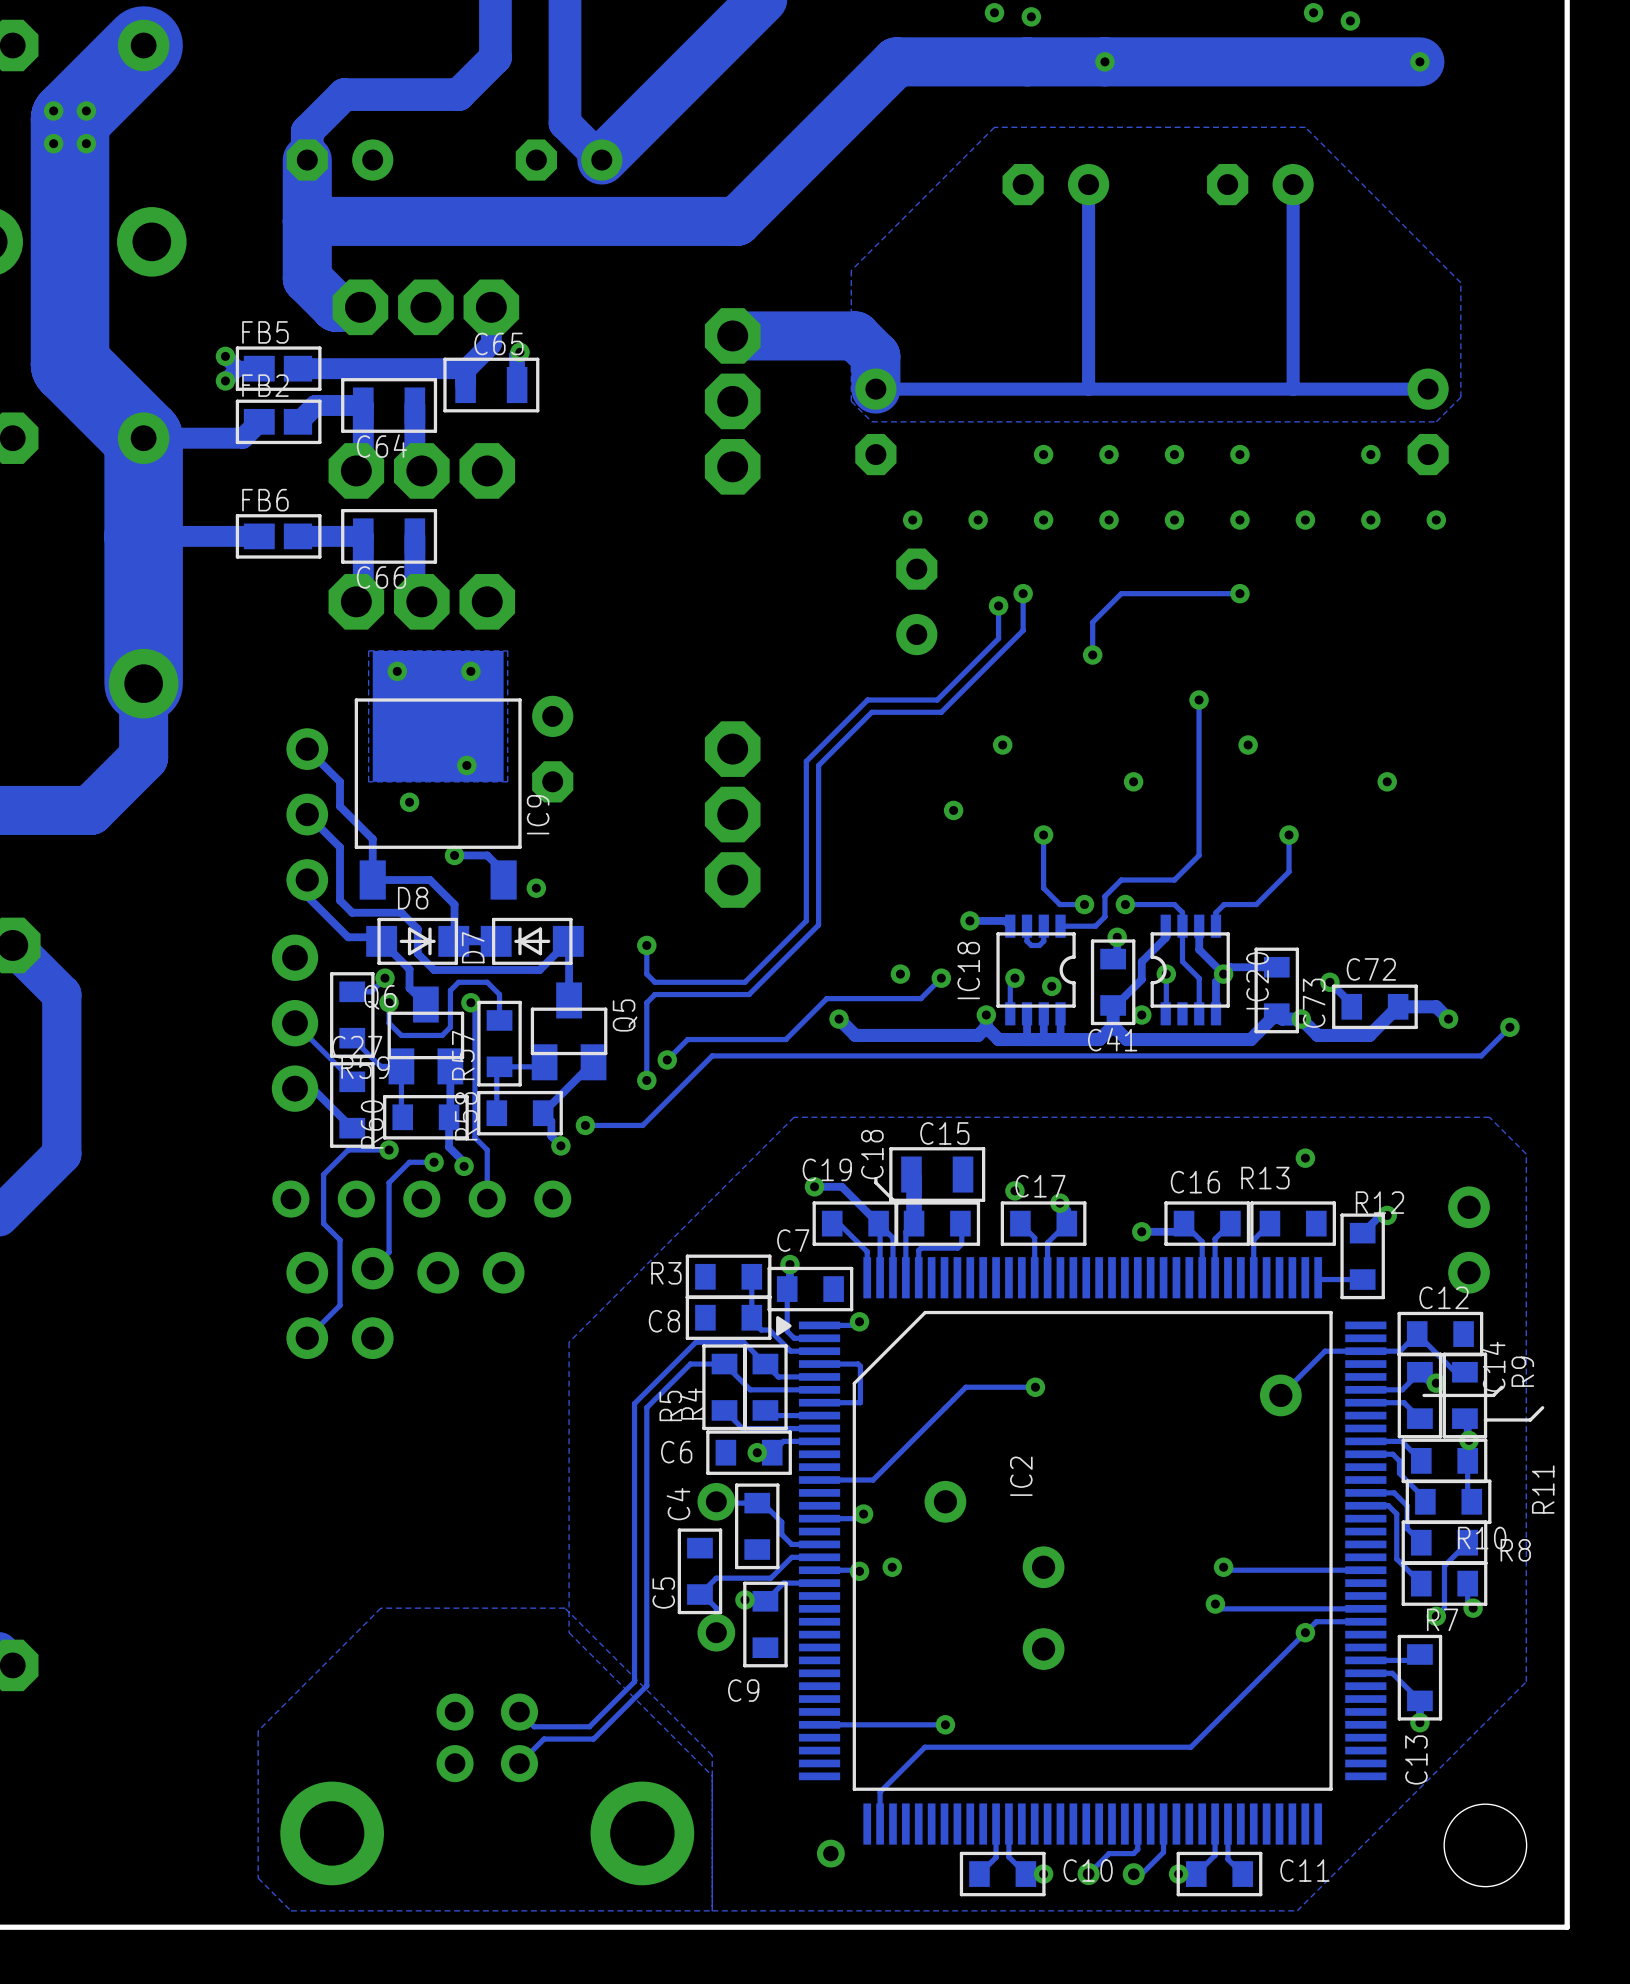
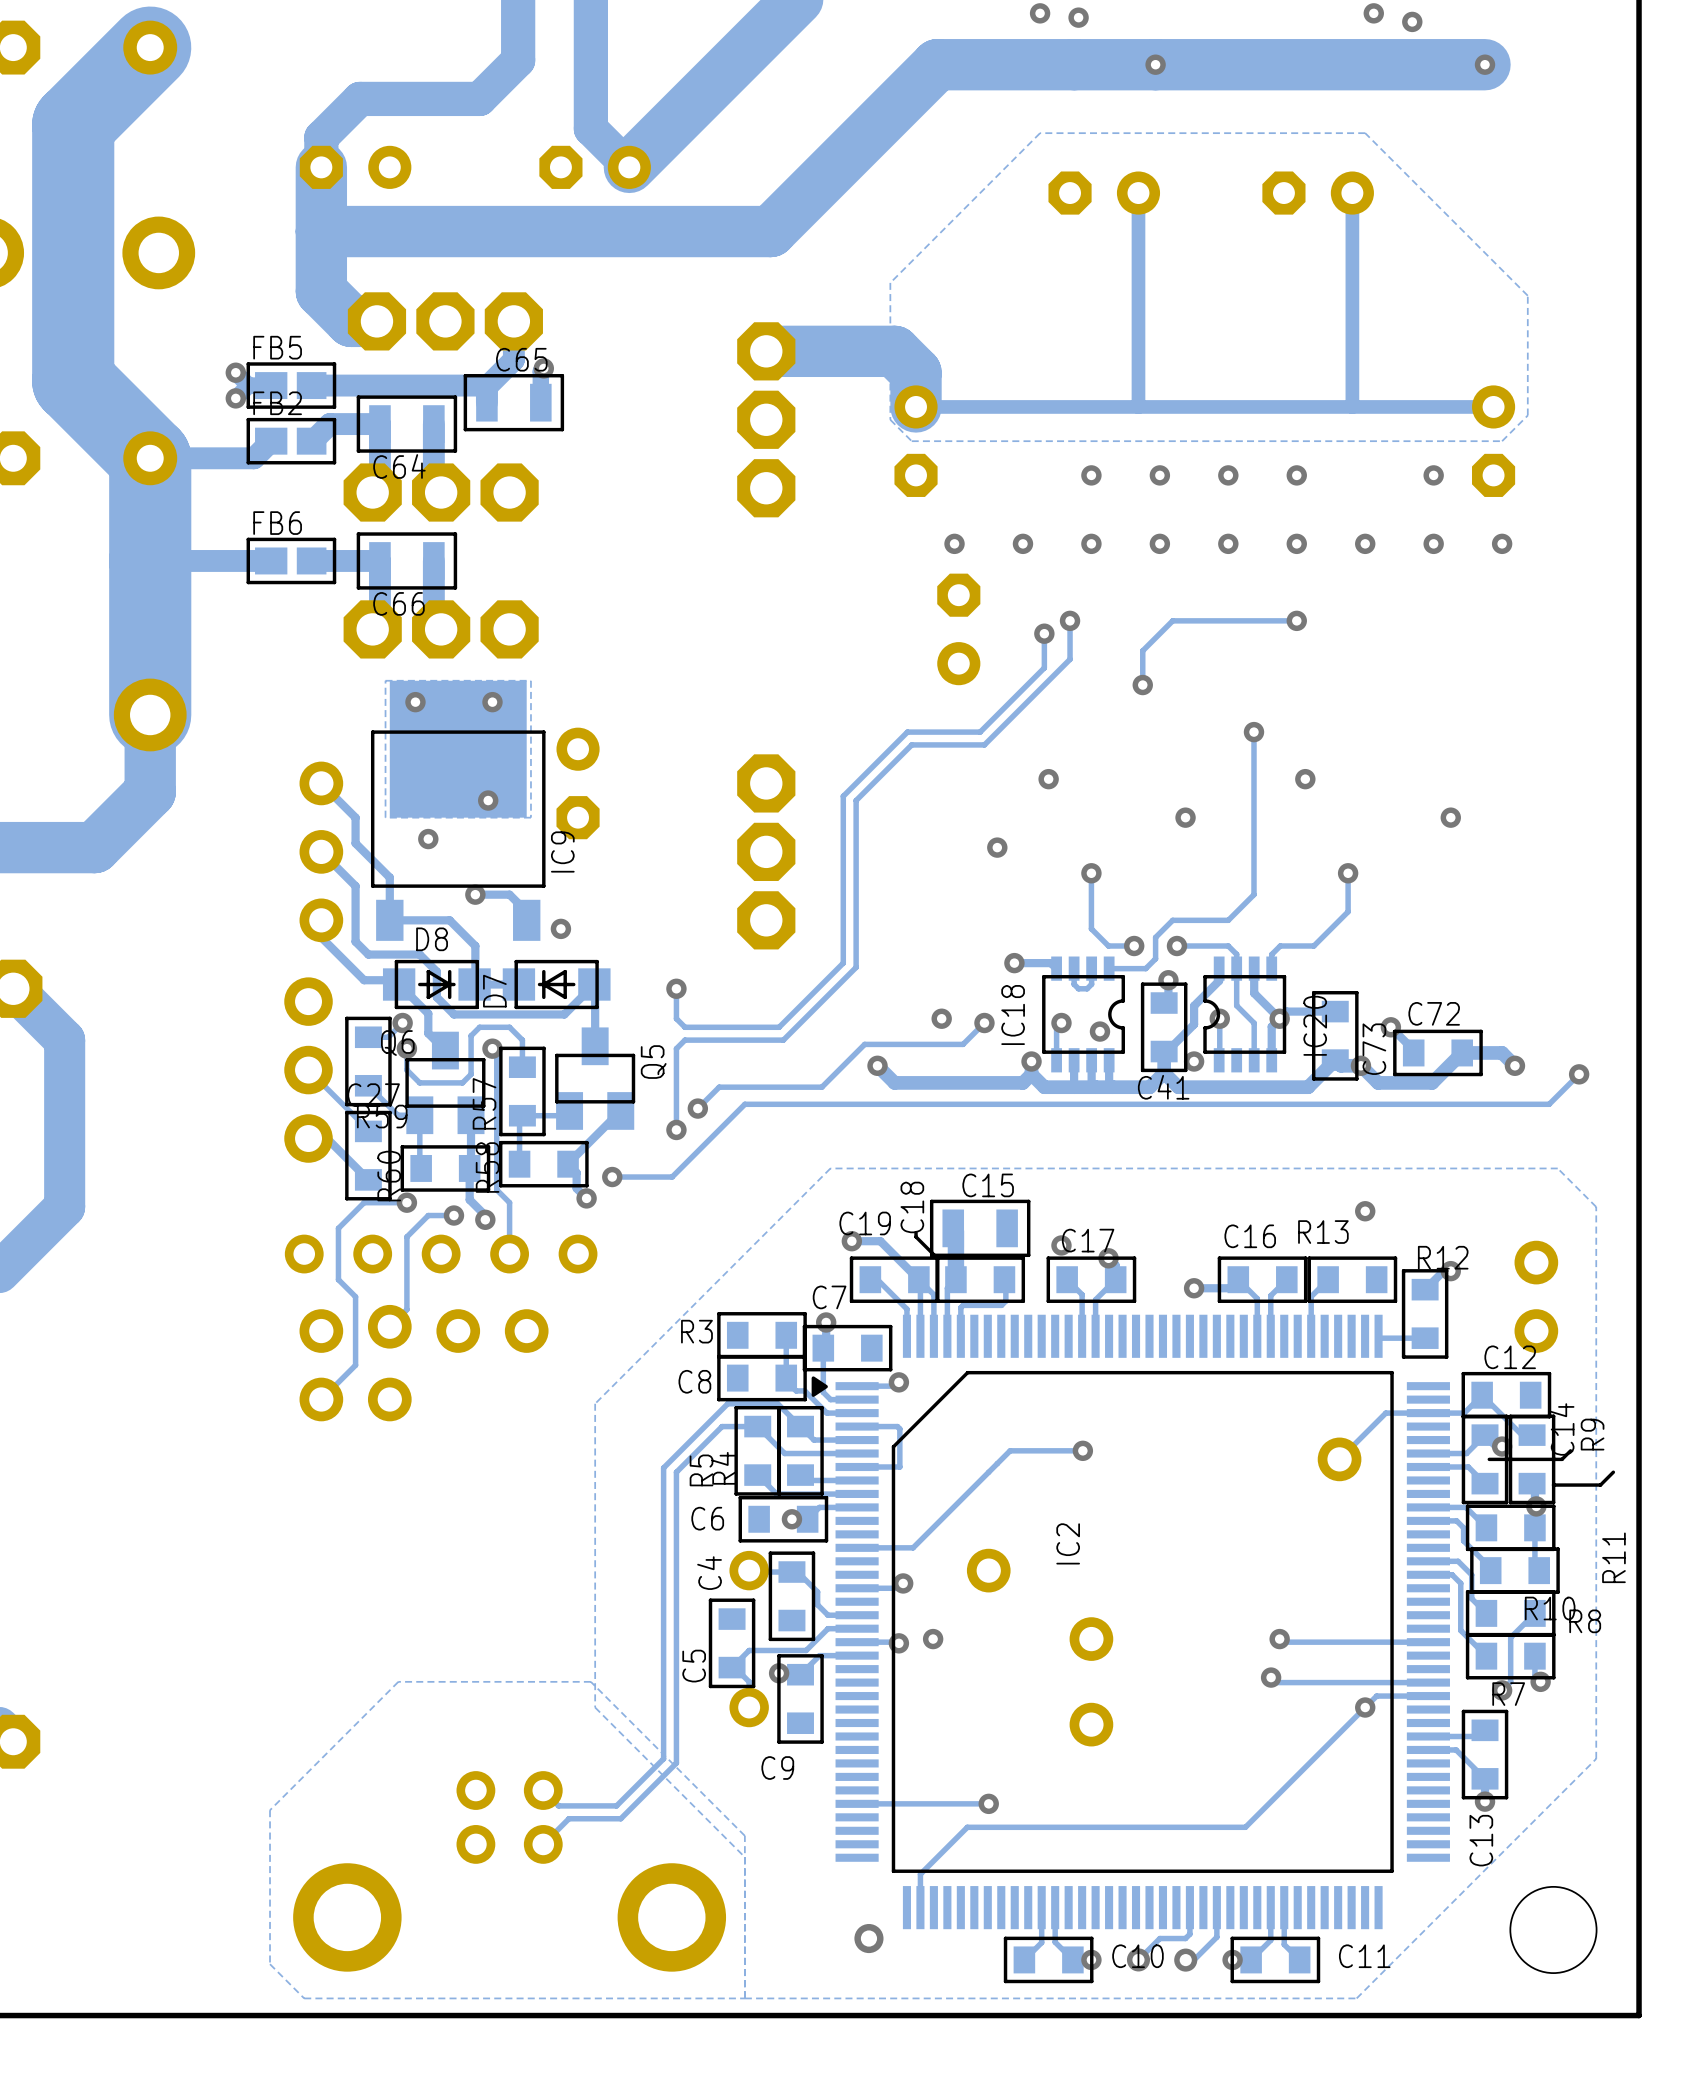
via: (53, 110) -> none
via: (86, 110) -> none
via: (53, 143) -> none
via: (86, 143) -> none

